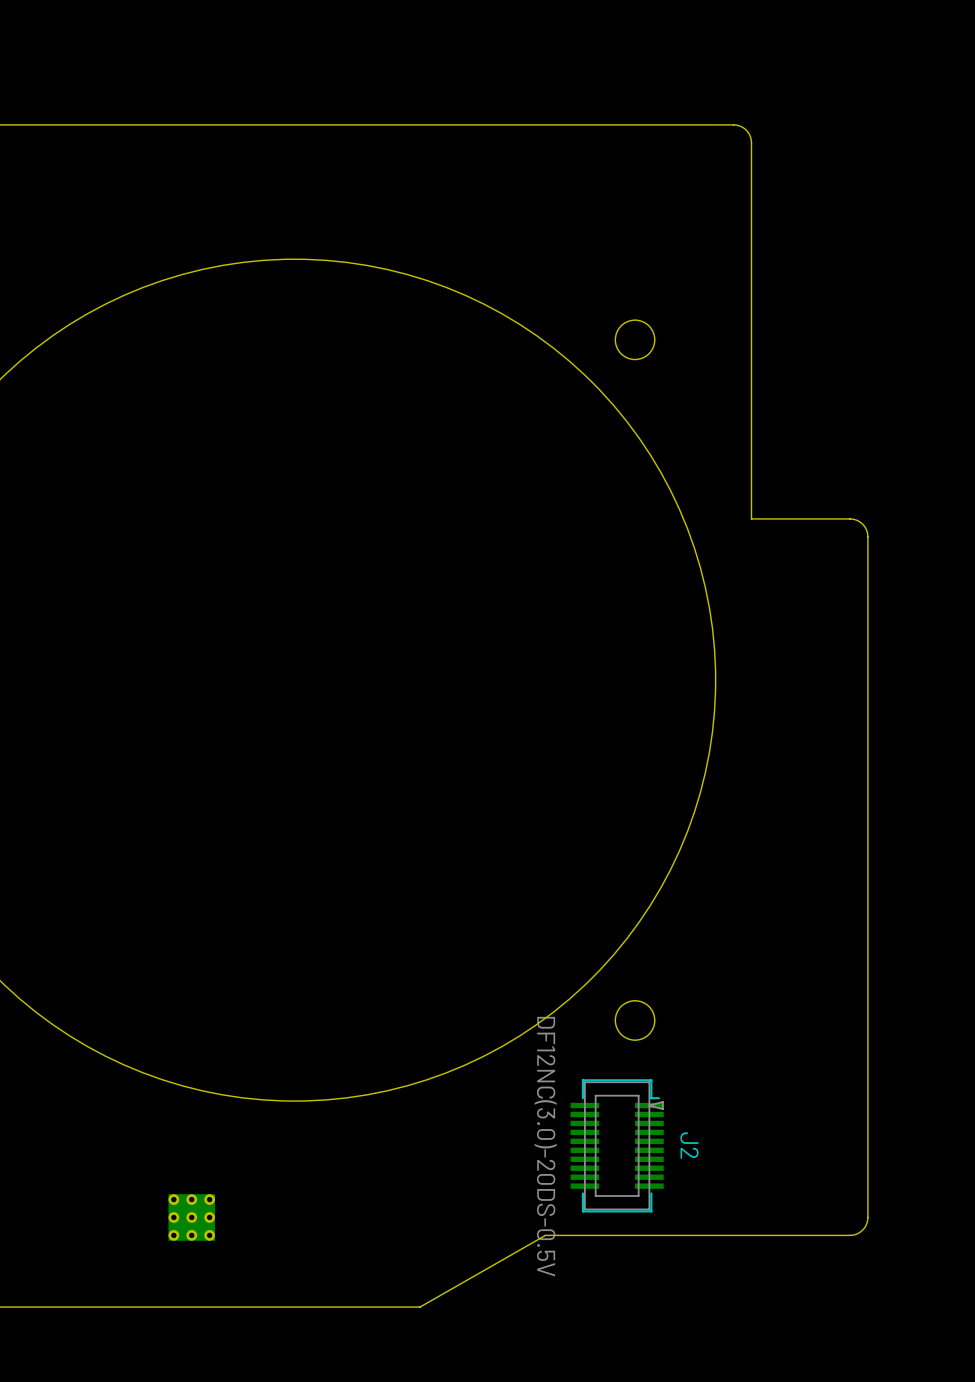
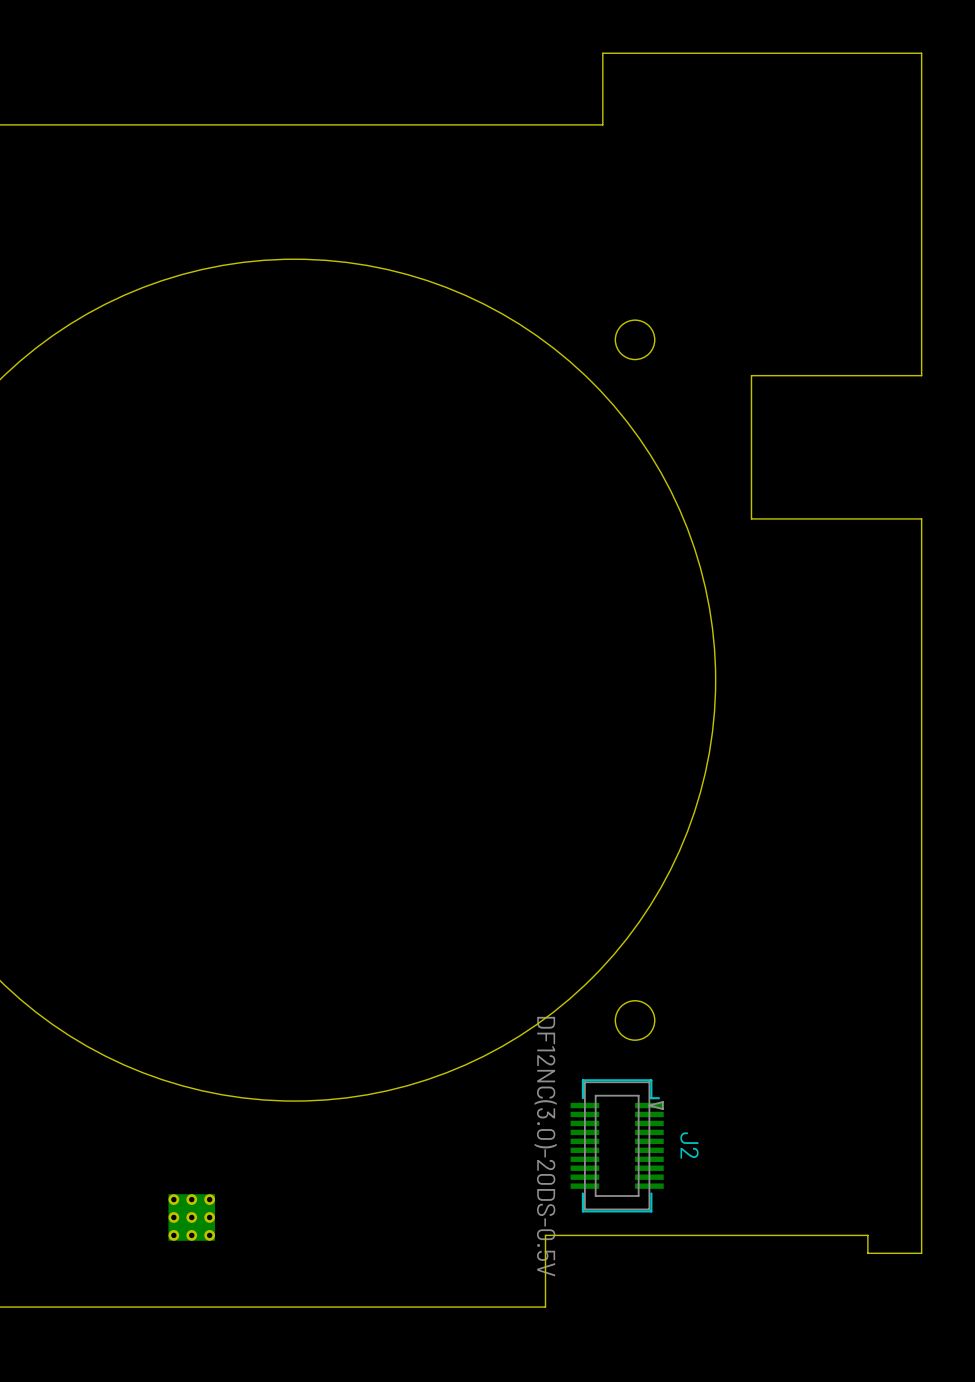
board edge: (602, 124) (735, 125) (743, 127) (748, 133) (751, 142) (751, 375) -> (602, 124) (602, 53) (921, 53) (921, 375) (751, 375)
board edge: (849, 518) (862, 524) (867, 536) (867, 1217) (862, 1230) (849, 1235) -> (849, 518) (921, 518) (921, 1253) (867, 1253) (867, 1235) (849, 1235)
board edge: (545, 1235) (420, 1307) -> (545, 1235) (545, 1307) (420, 1307)

